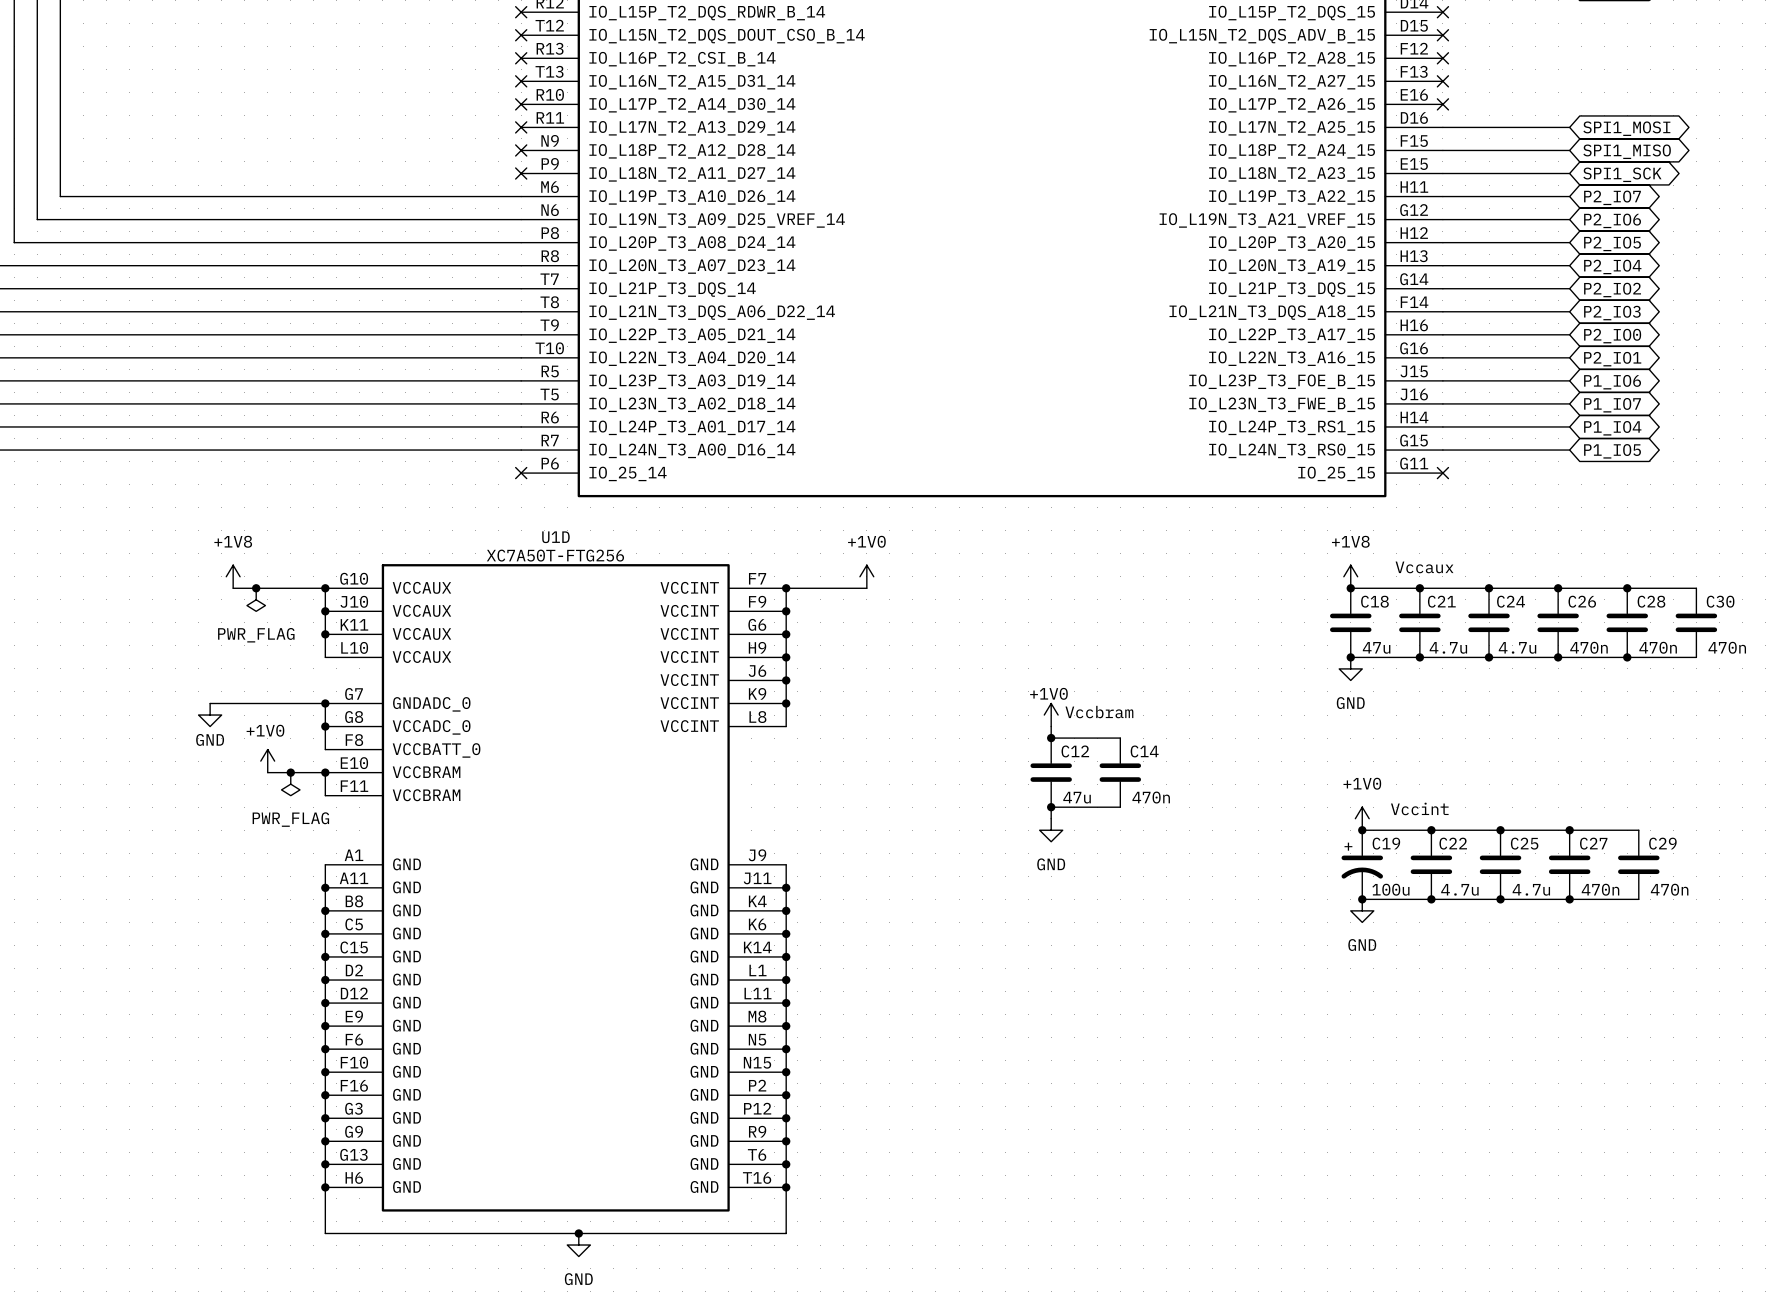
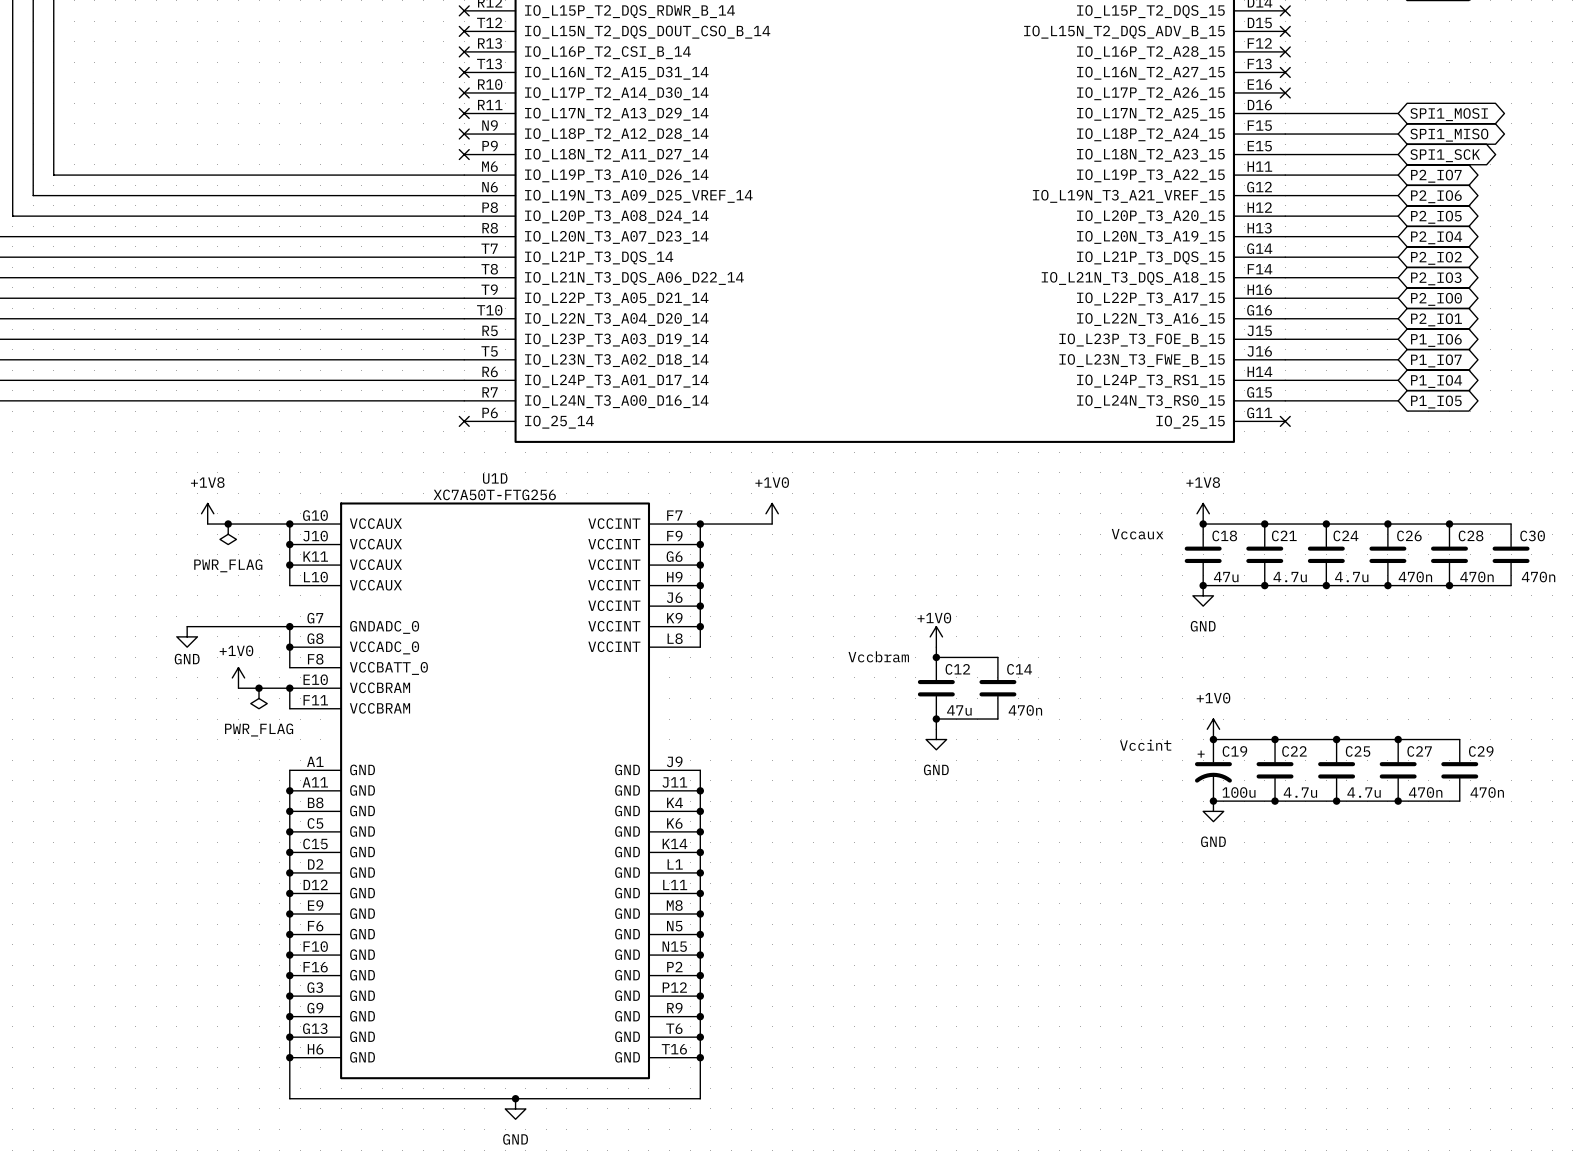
text position: Vccaux (1424, 567) -> Vccaux (1137, 534)
text position: Vccbram (1099, 712) -> Vccbram (878, 656)
text position: Vccint (1419, 808) -> Vccint (1145, 745)

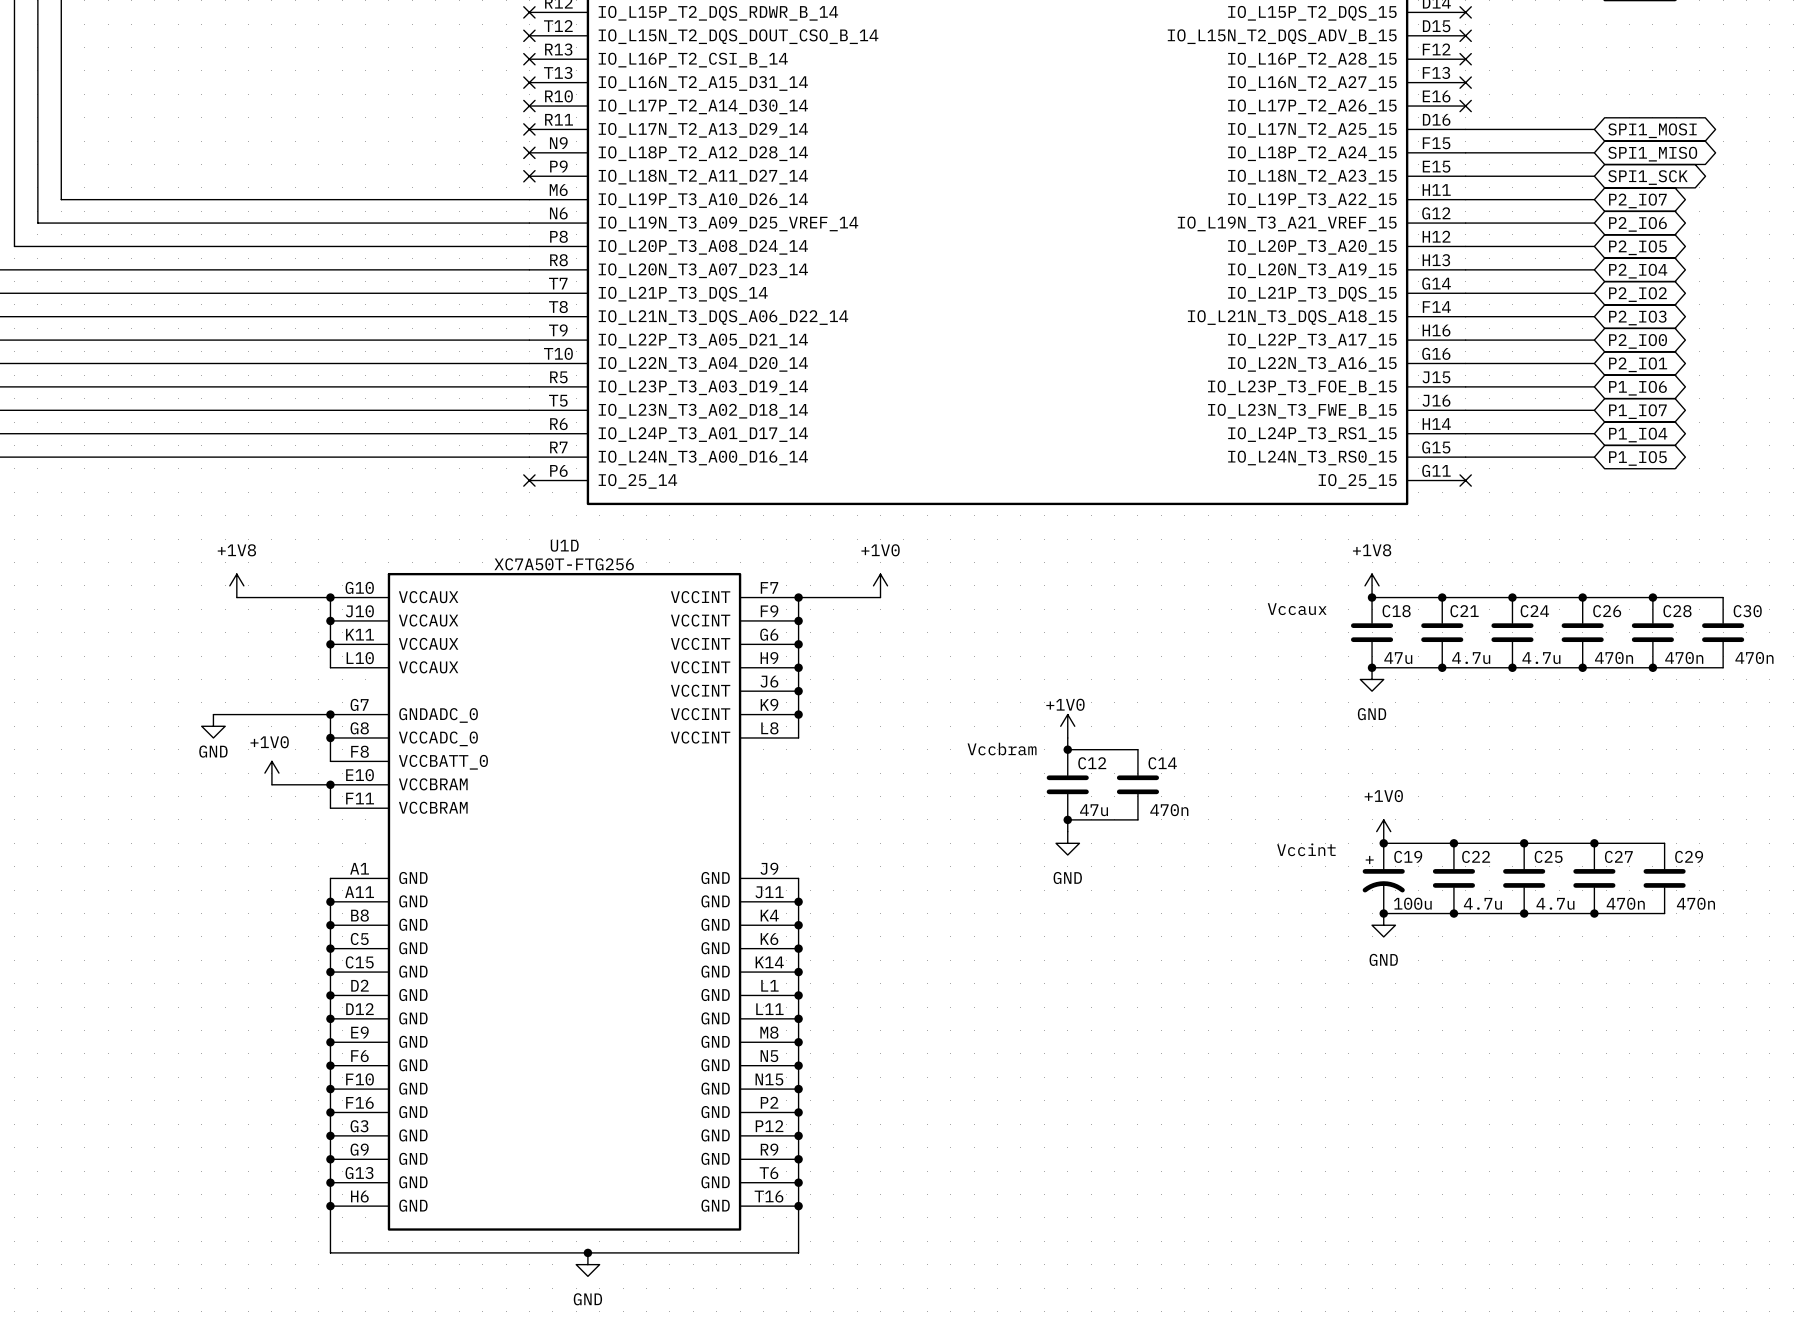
junction: (228, 524) -> none
power symbol: PWR_FLAG (228, 534) -> none
junction: (259, 688) -> none
power symbol: PWR_FLAG (259, 698) -> none

